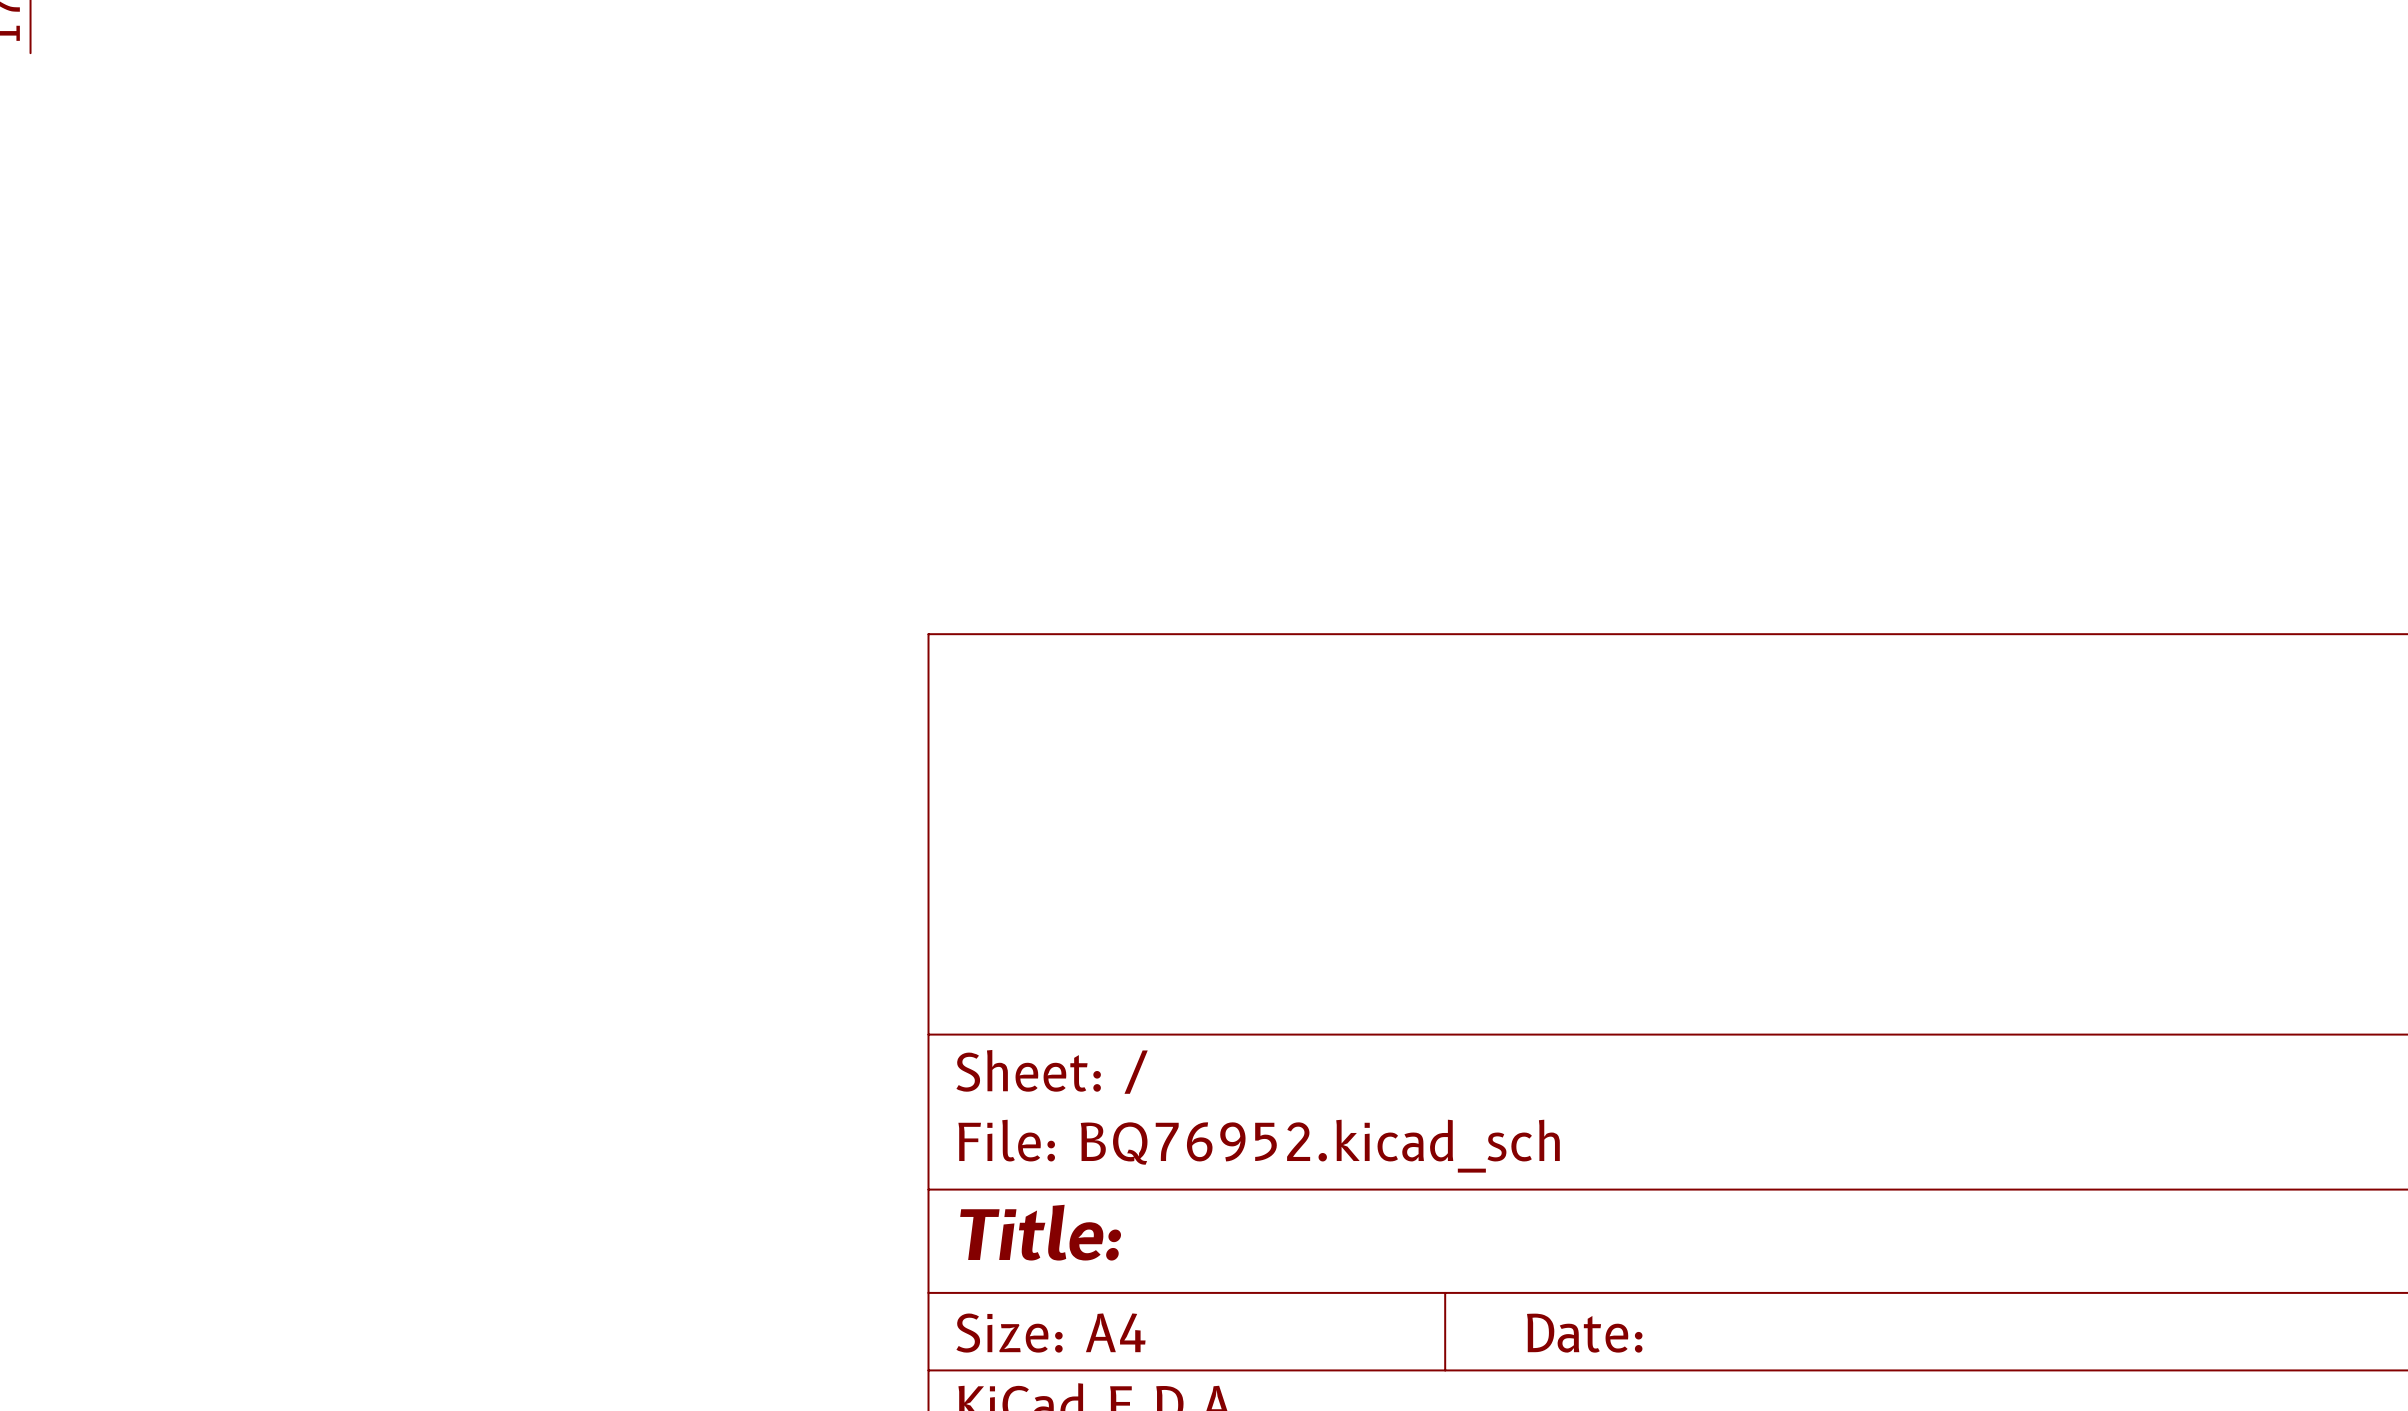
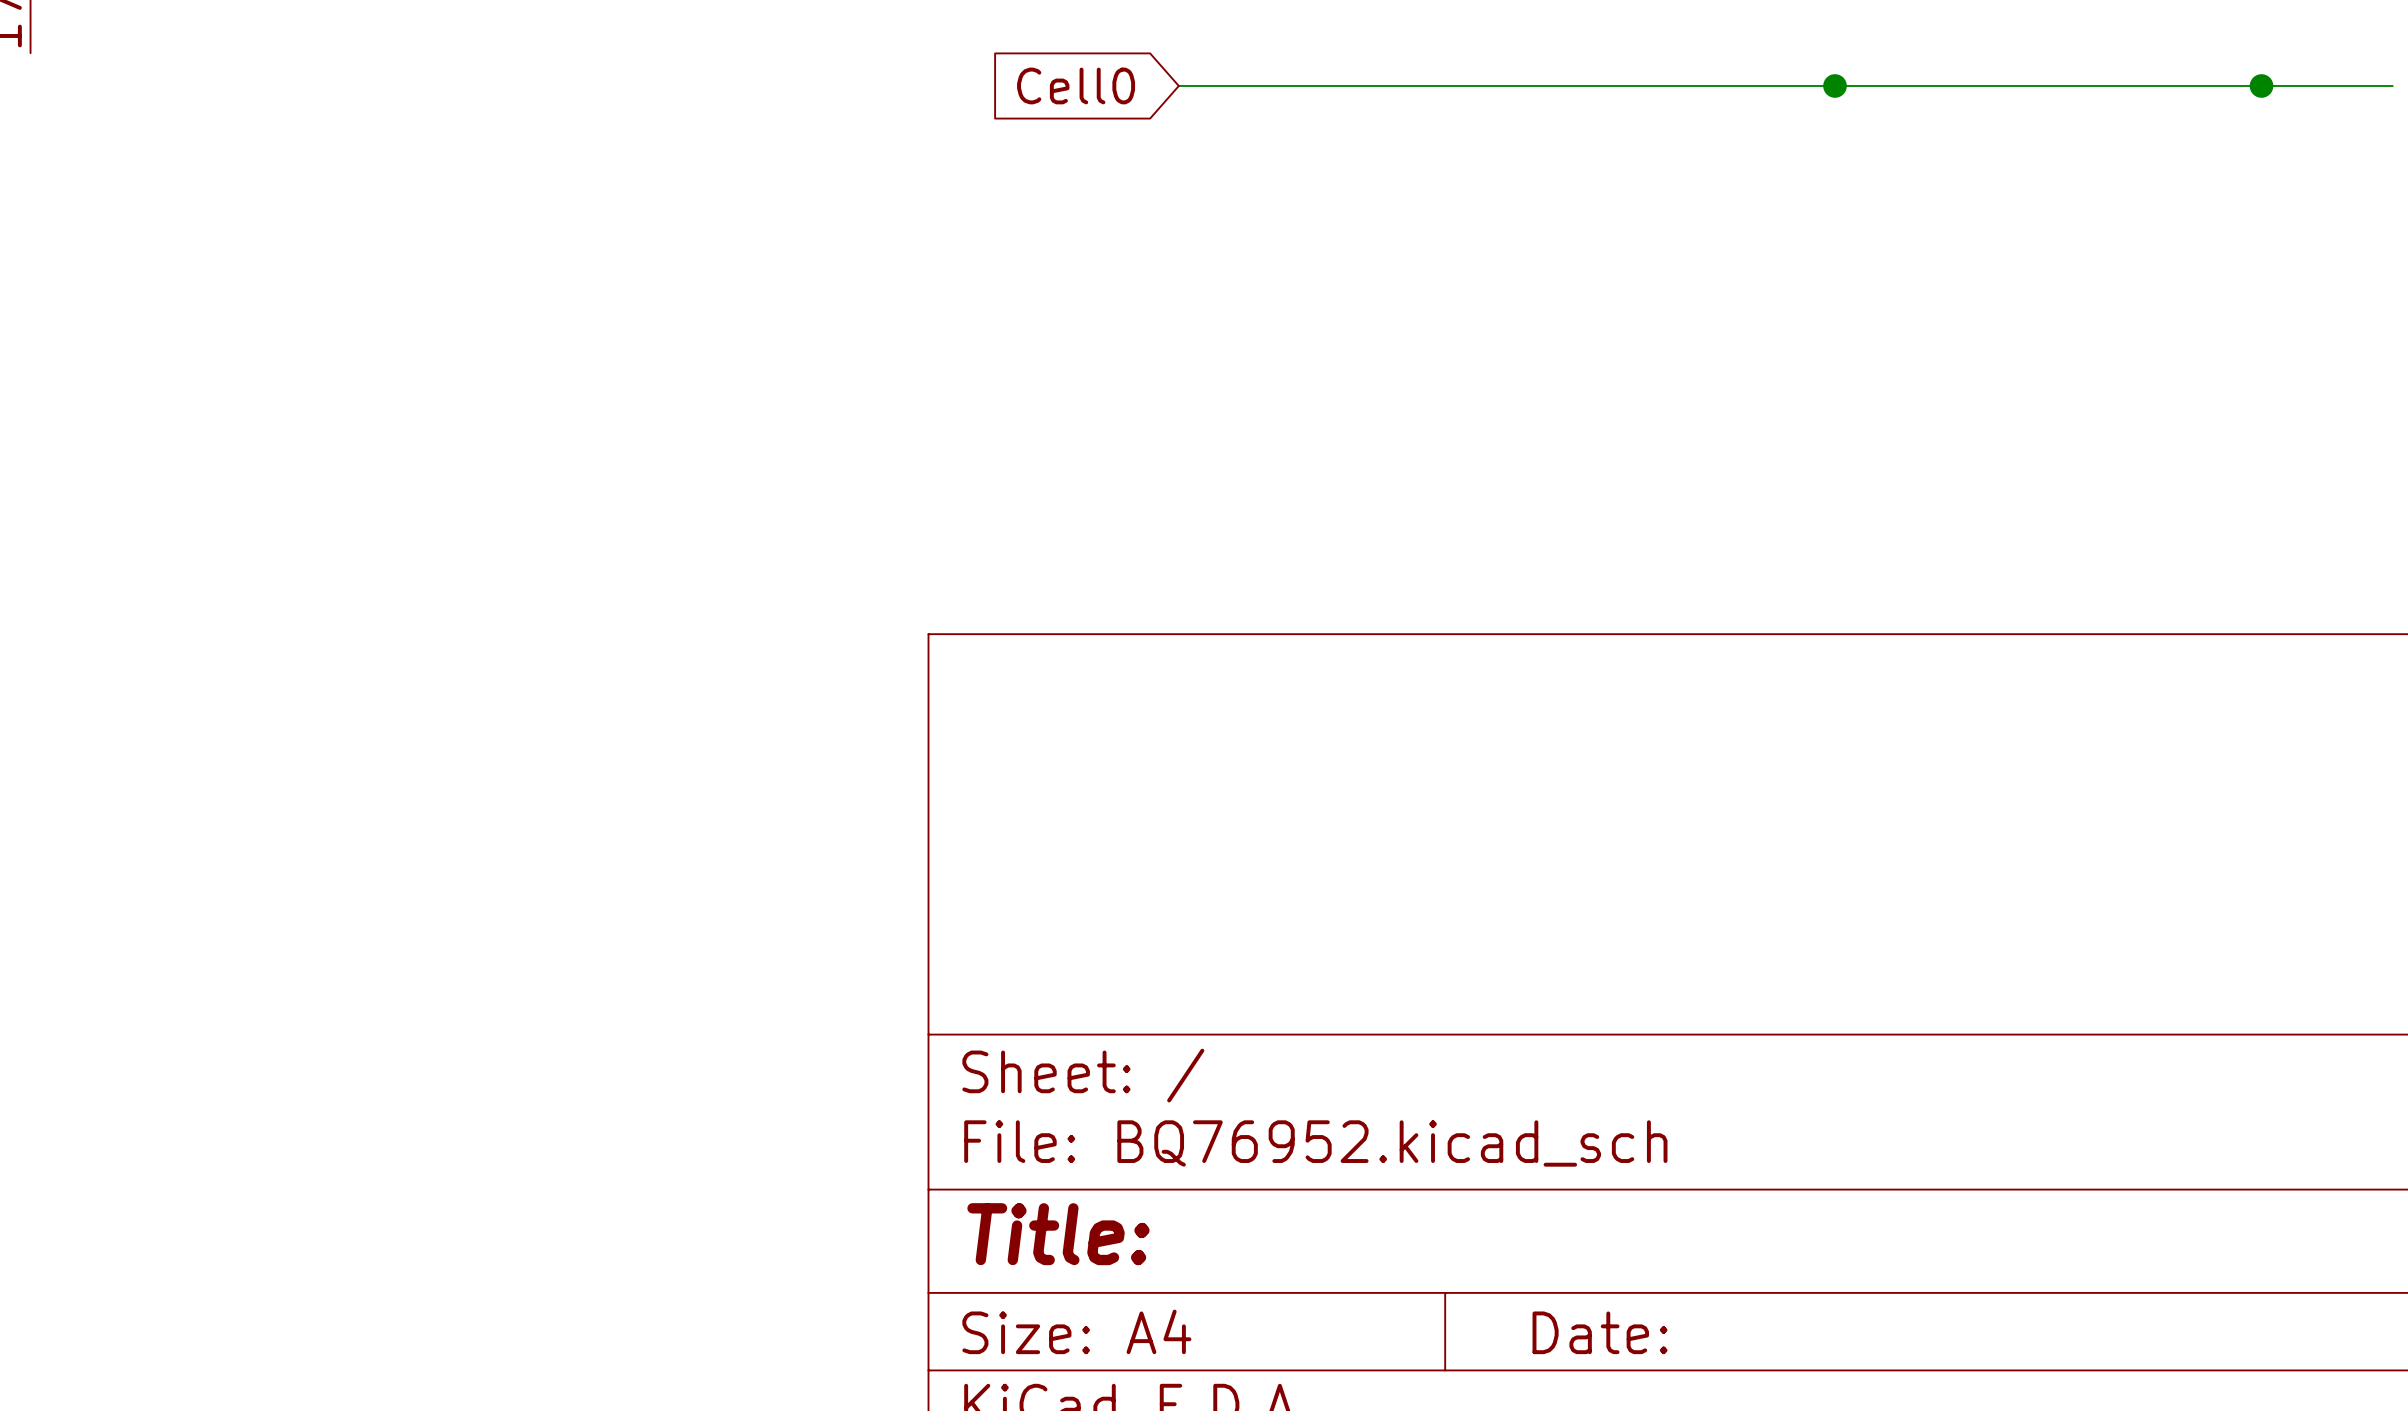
global label: none -> Cell0 (1076, 85)
wire: none -> (1178, 85) (2392, 85)
junction: none -> (1835, 85)
junction: none -> (2261, 85)

